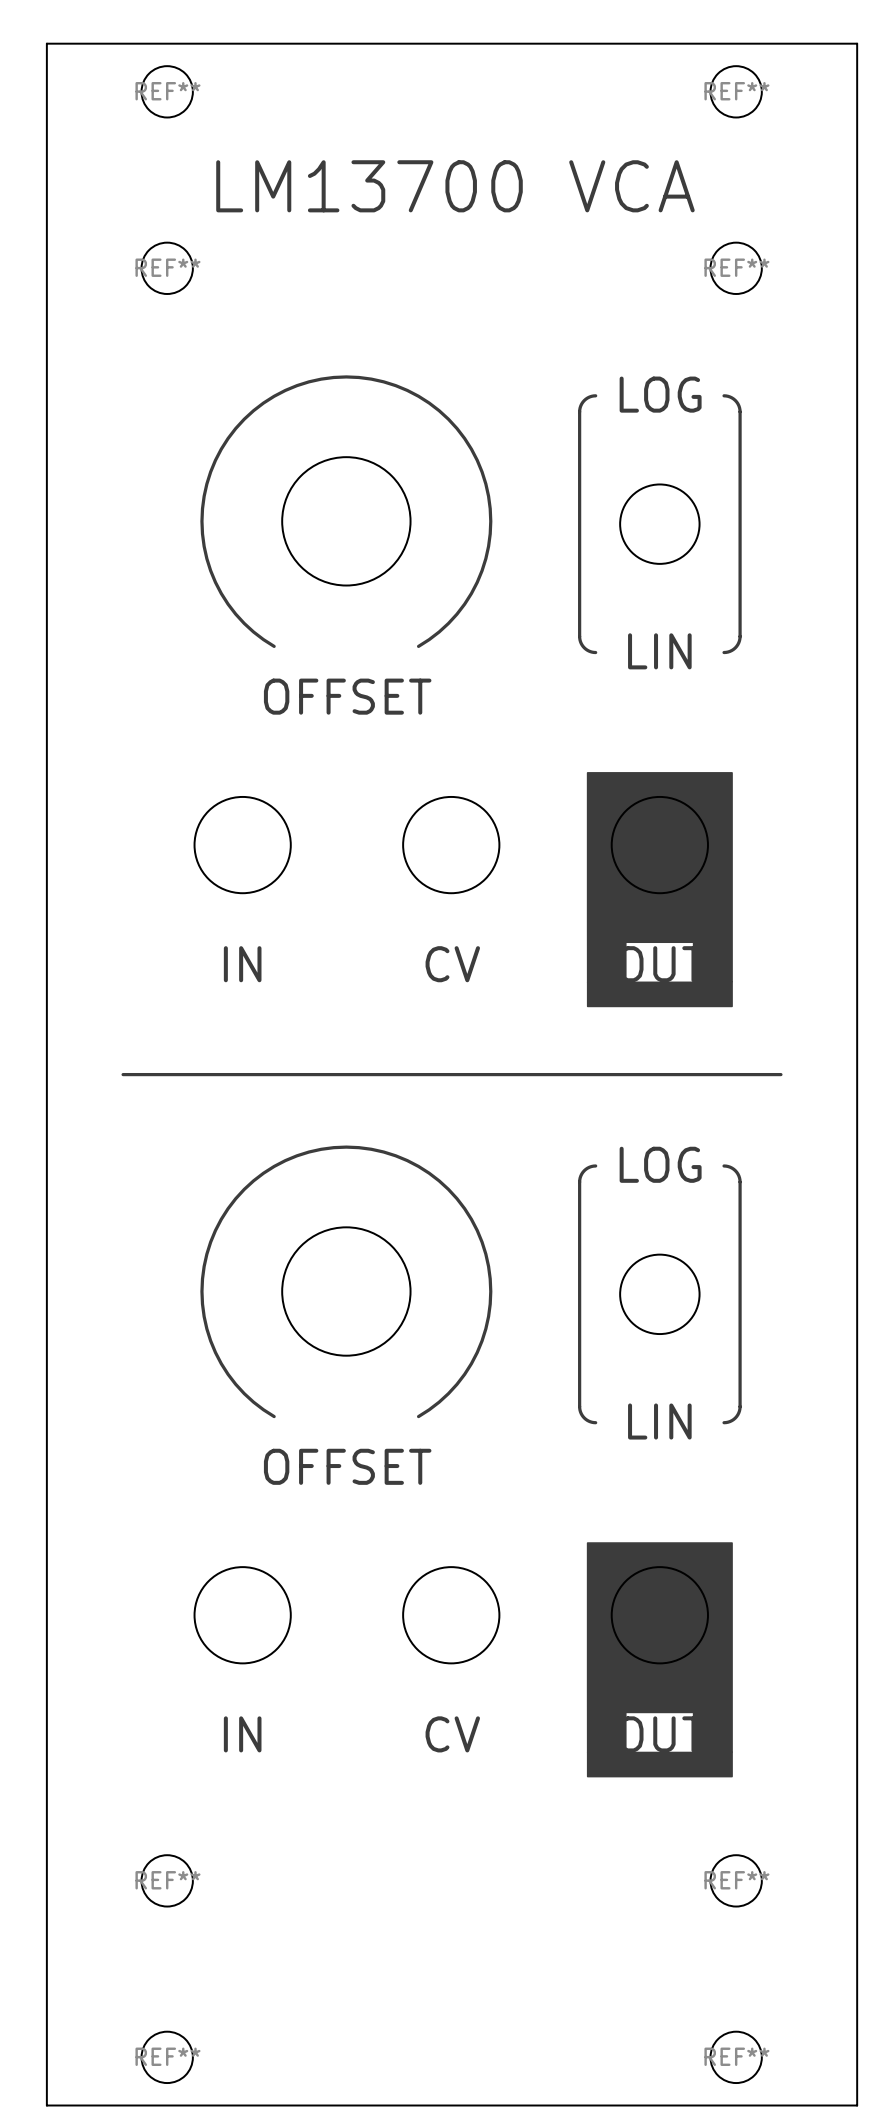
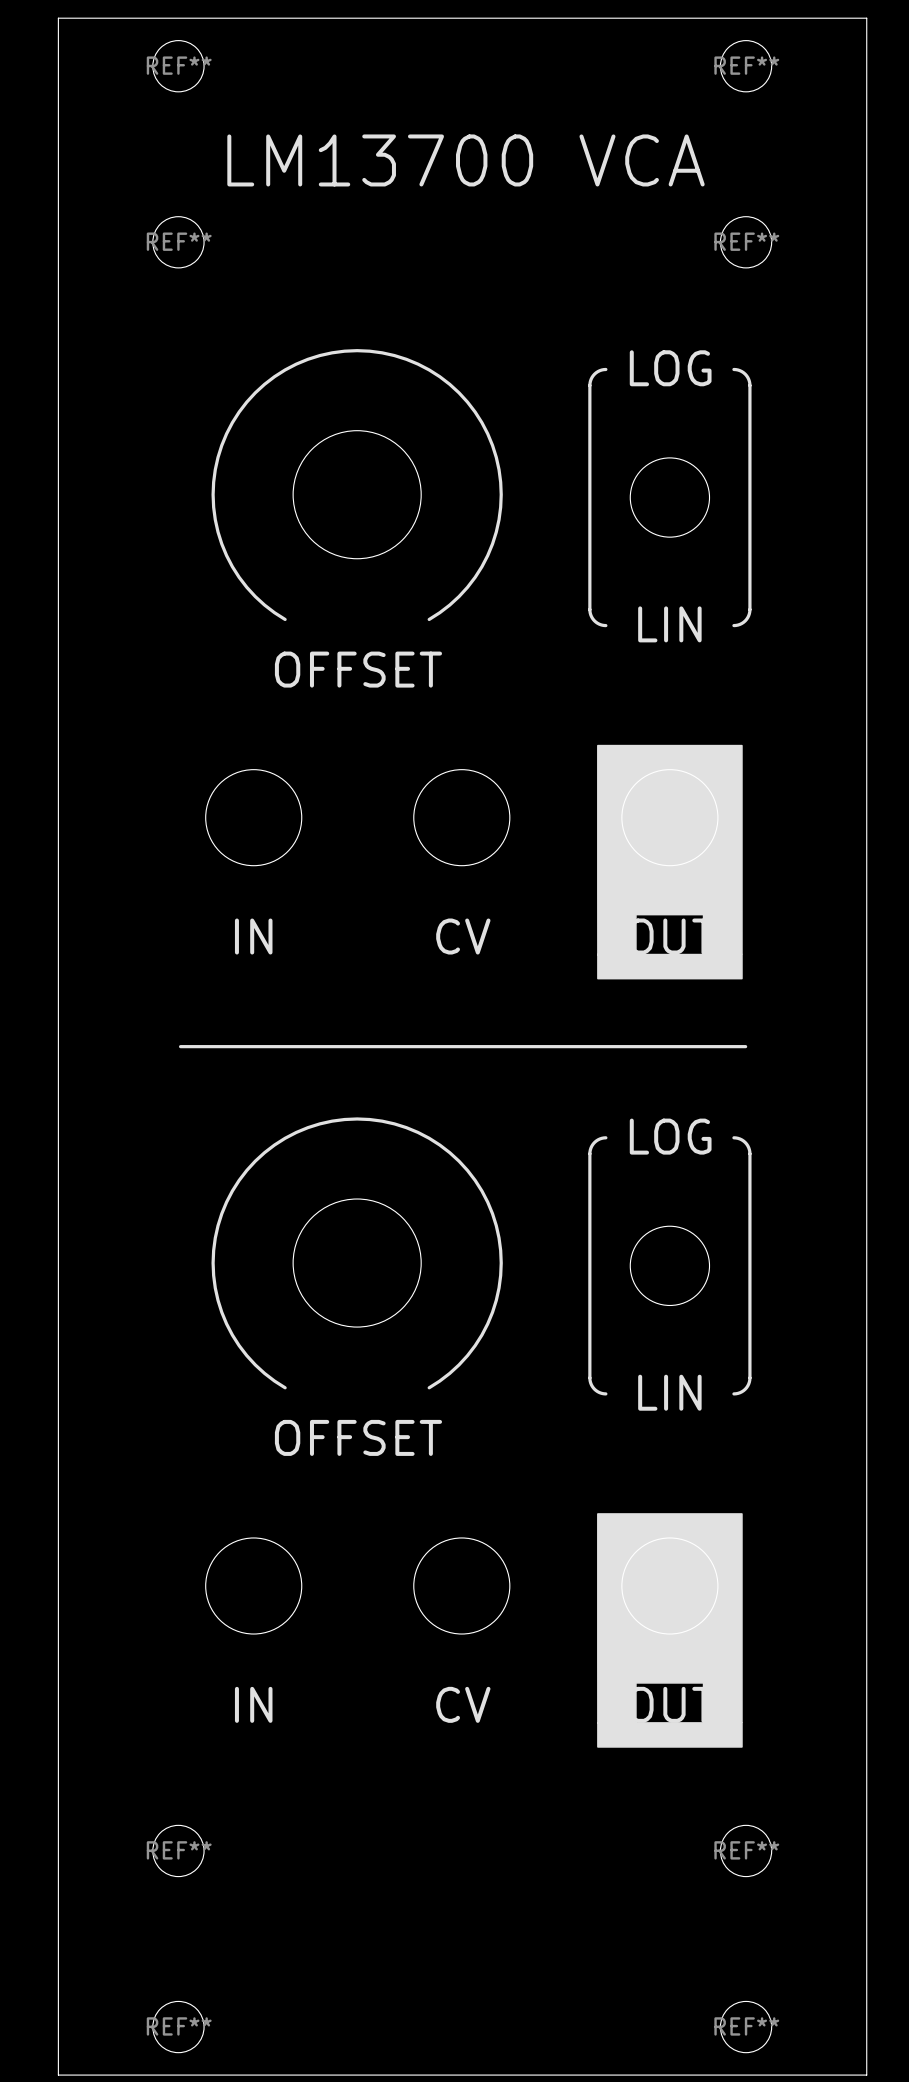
line: (123, 1074) (169, 1074) -> none
line: (735, 1074) (780, 1074) -> none

